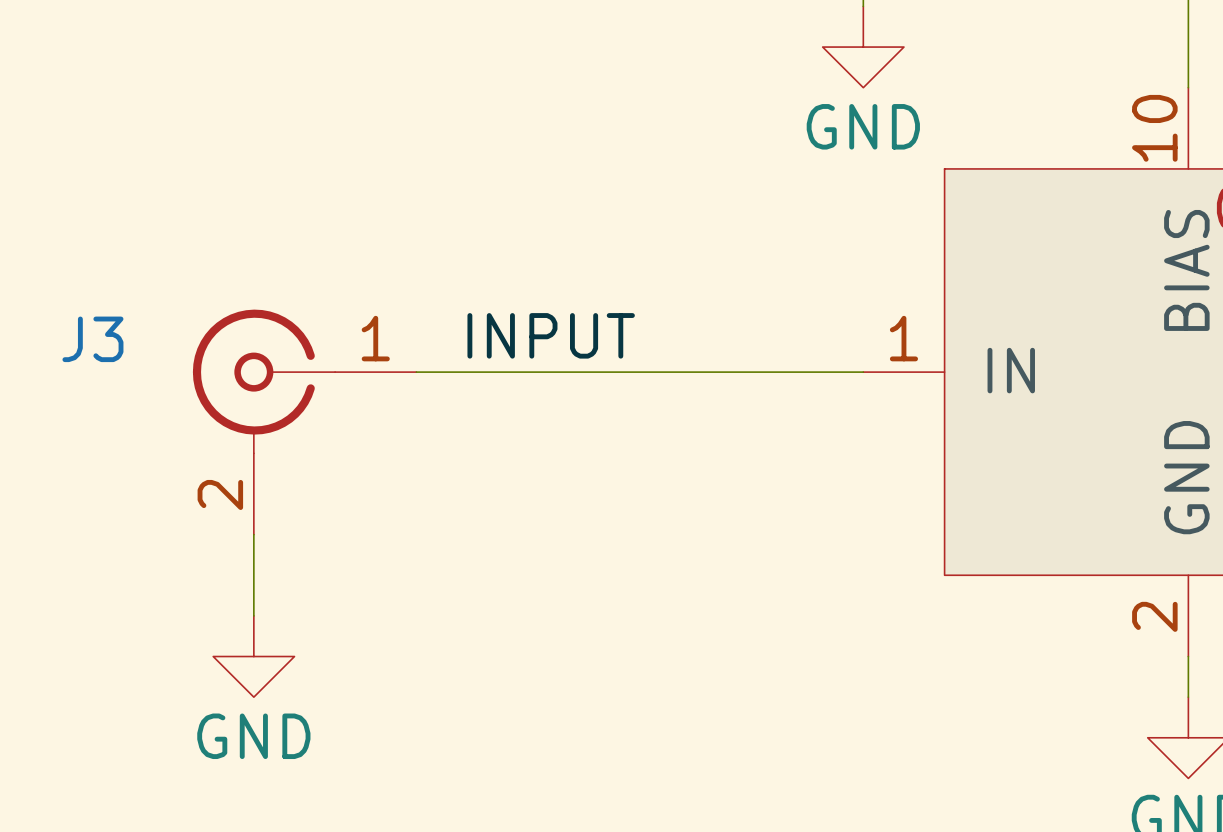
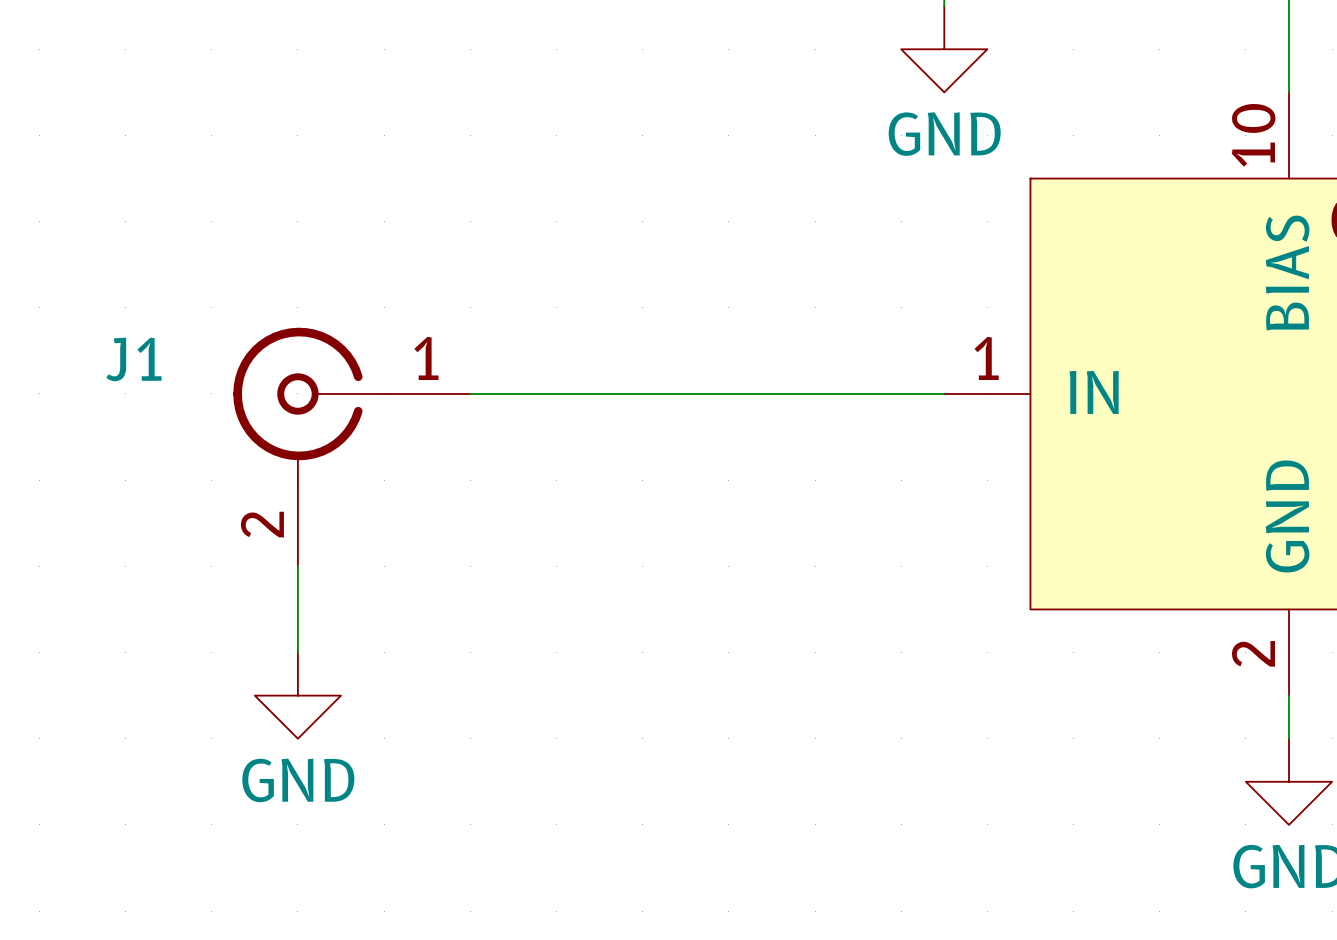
label: INPUT (551, 335) -> none
J3 name: J3 (92, 339) -> J1 (133, 359)

